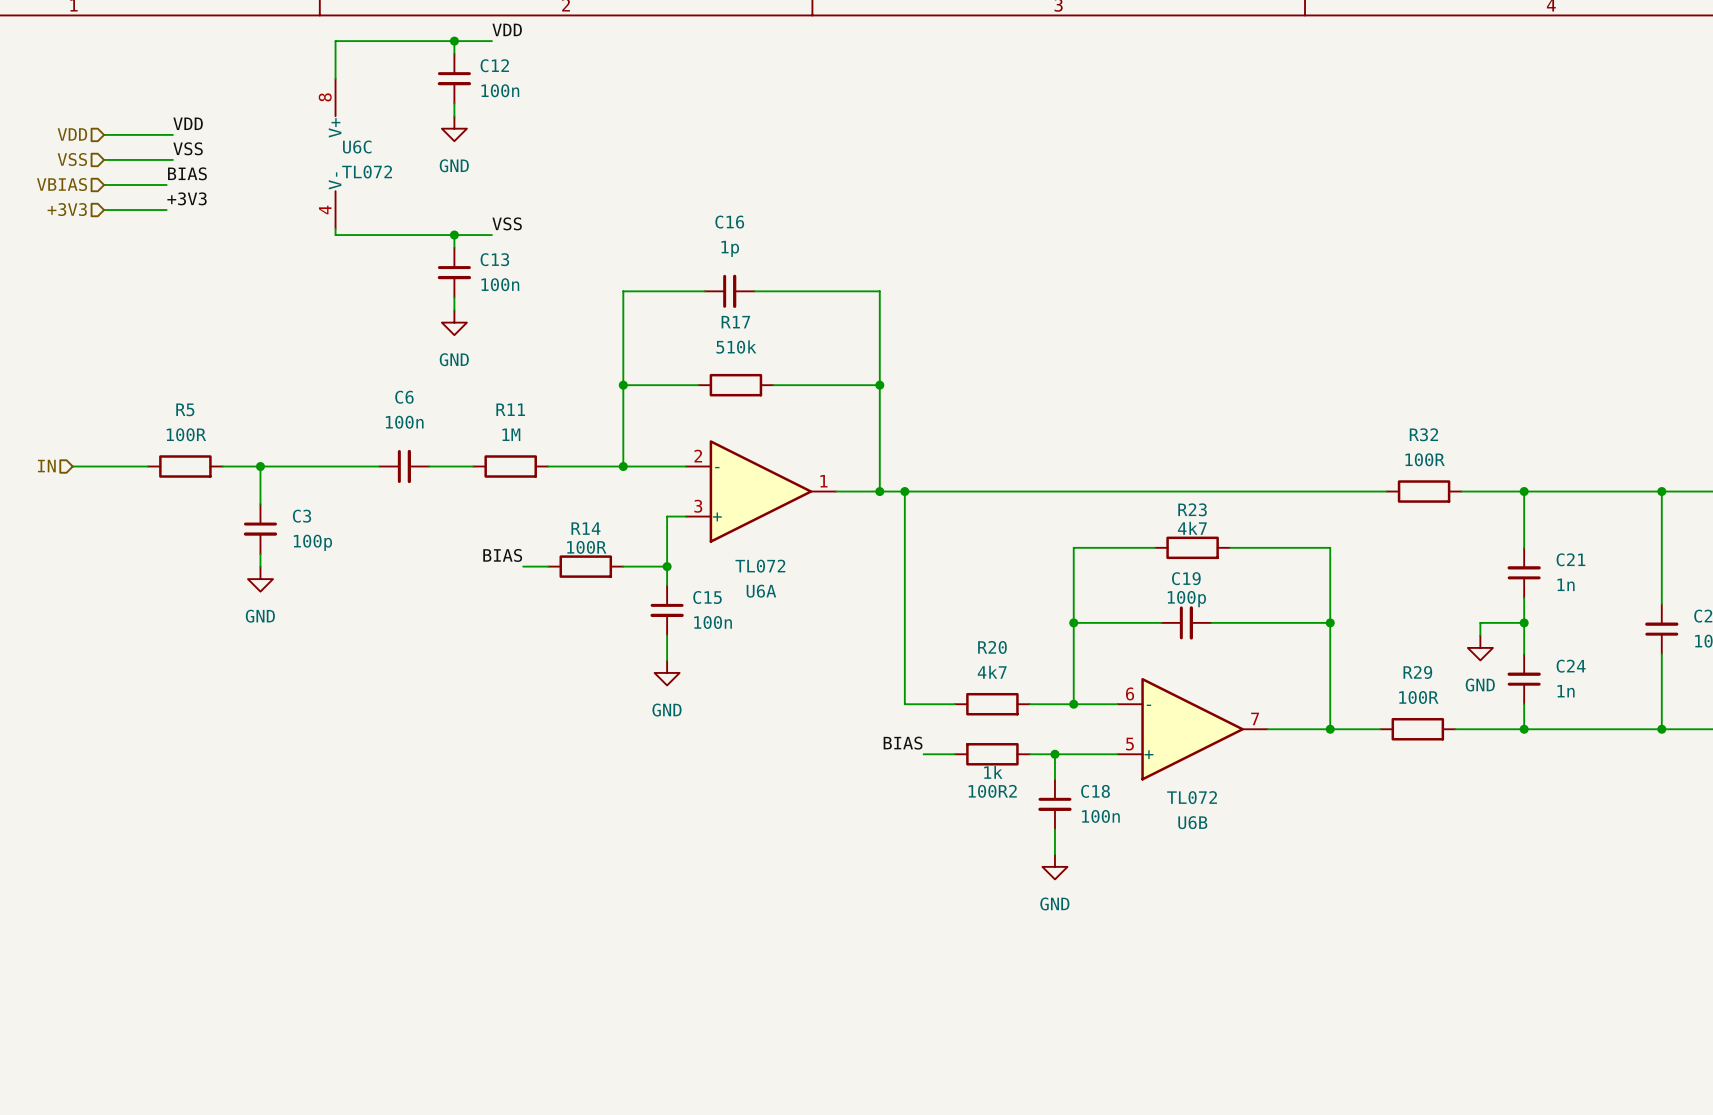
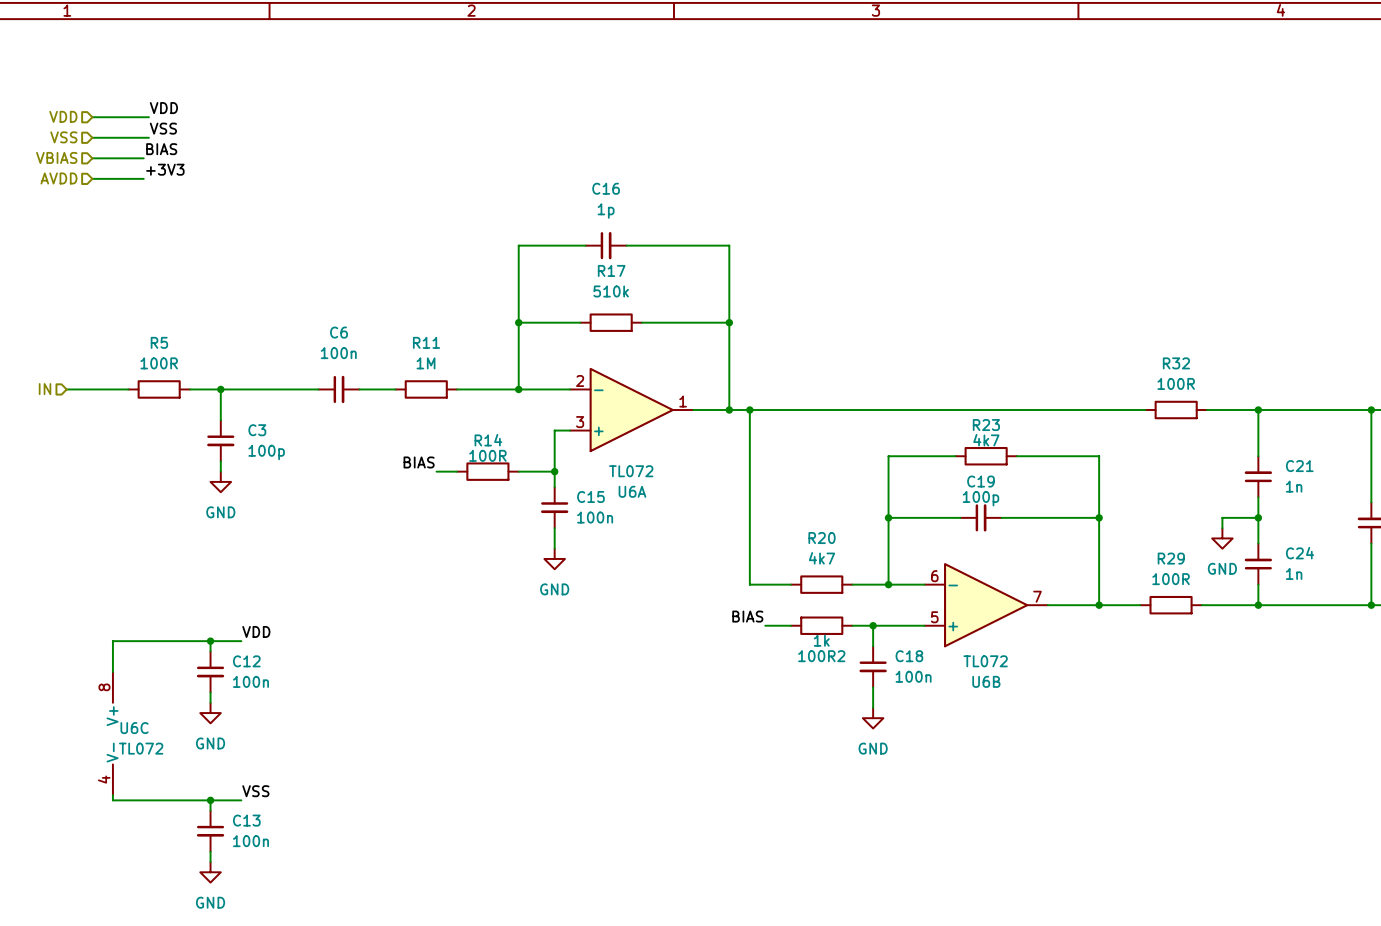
label: VDD (507, 29) -> none
wire: (454, 41) (454, 53) -> none
junction: (454, 41) -> none
wire: (491, 41) (335, 41) (335, 78) -> none
C12 position: (454, 78) -> (210, 671)
wire: (454, 103) (454, 116) -> none
power symbol: GND (454, 128) -> none
U6C position: (335, 153) -> (112, 733)
hierarchical label: +3V3 (67, 209) -> AVDD (58, 178)
label: VSS (507, 223) -> none
wire: (335, 228) (335, 235) (491, 235) -> none
wire: (454, 235) (454, 247) -> none
junction: (454, 235) -> none
C13 position: (454, 272) -> (210, 831)
wire: (454, 297) (454, 310) -> none
power symbol: GND (454, 322) -> none
label: none -> VDD (256, 631)
wire: none -> (210, 641) (210, 651)
junction: none -> (210, 641)
wire: none -> (241, 641) (112, 641) (112, 671)
wire: none -> (210, 692) (210, 702)
power symbol: none -> GND (210, 713)
label: none -> VSS (255, 791)
wire: none -> (112, 795) (112, 800) (241, 800)
wire: none -> (210, 800) (210, 810)
junction: none -> (210, 800)
wire: none -> (210, 851) (210, 862)
power symbol: none -> GND (210, 872)

